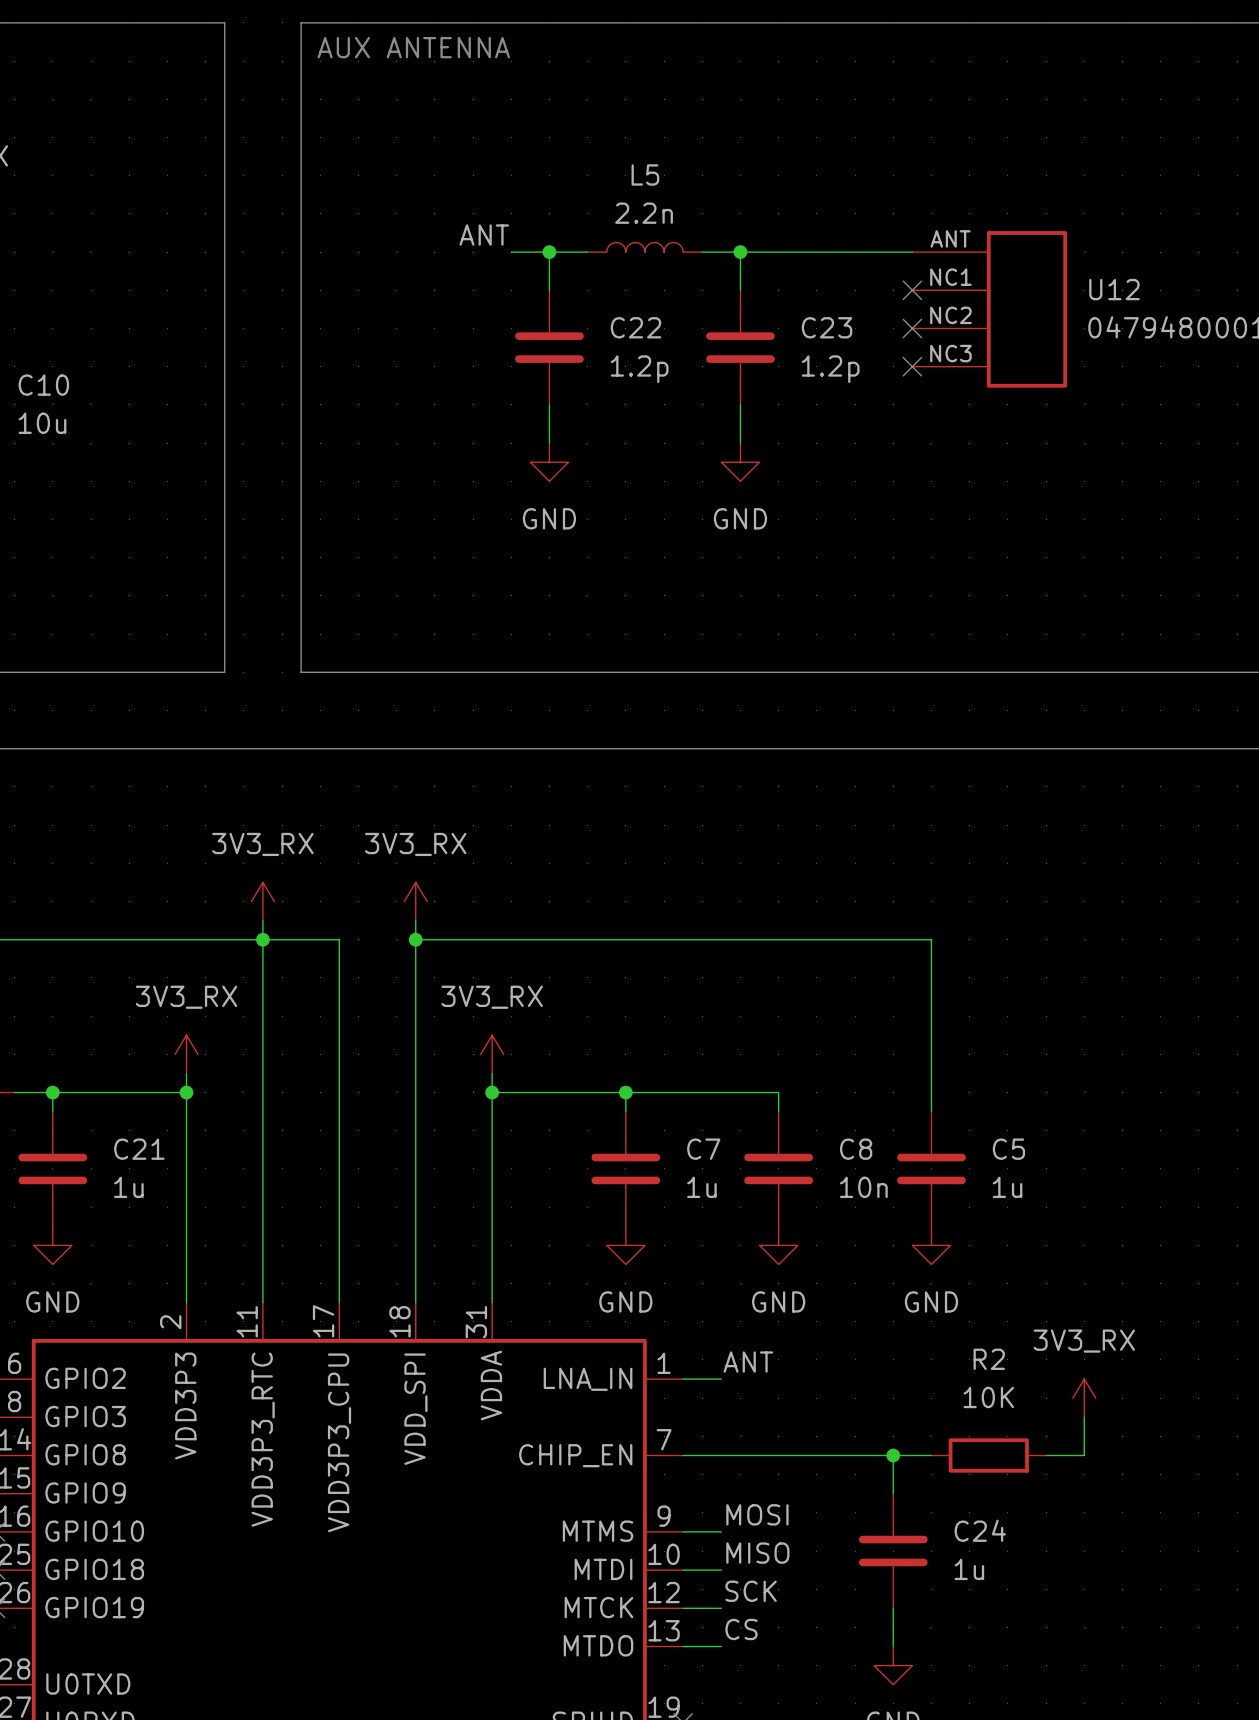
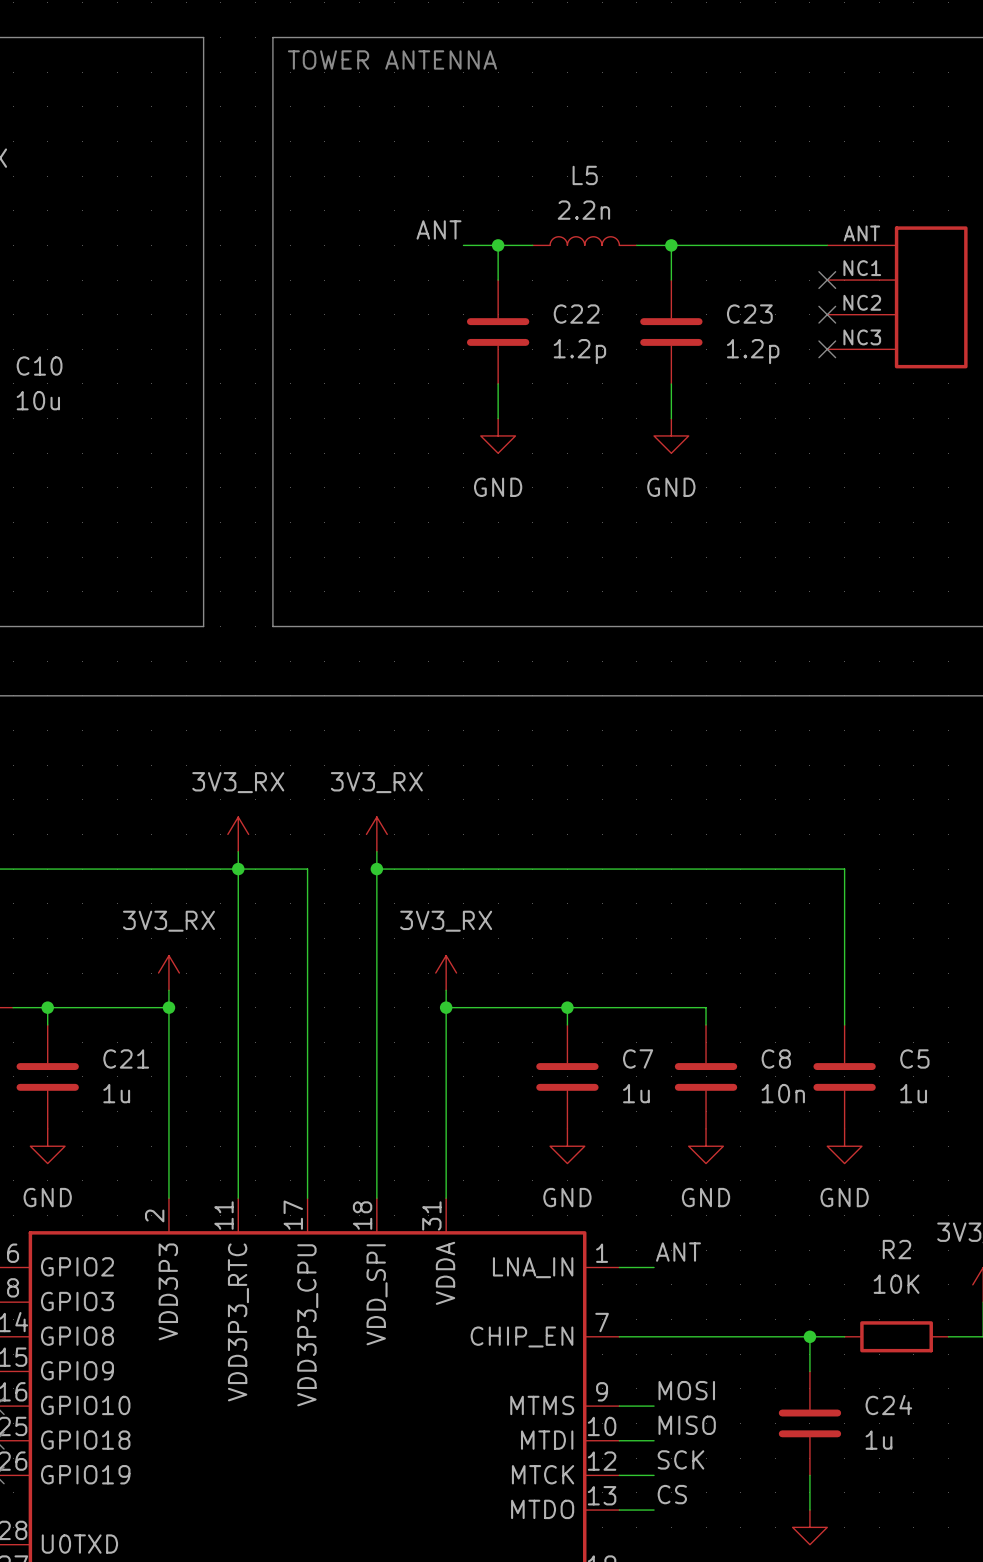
text: AUX ANTENNA (413, 47) -> TOWER ANTENNA (392, 59)

